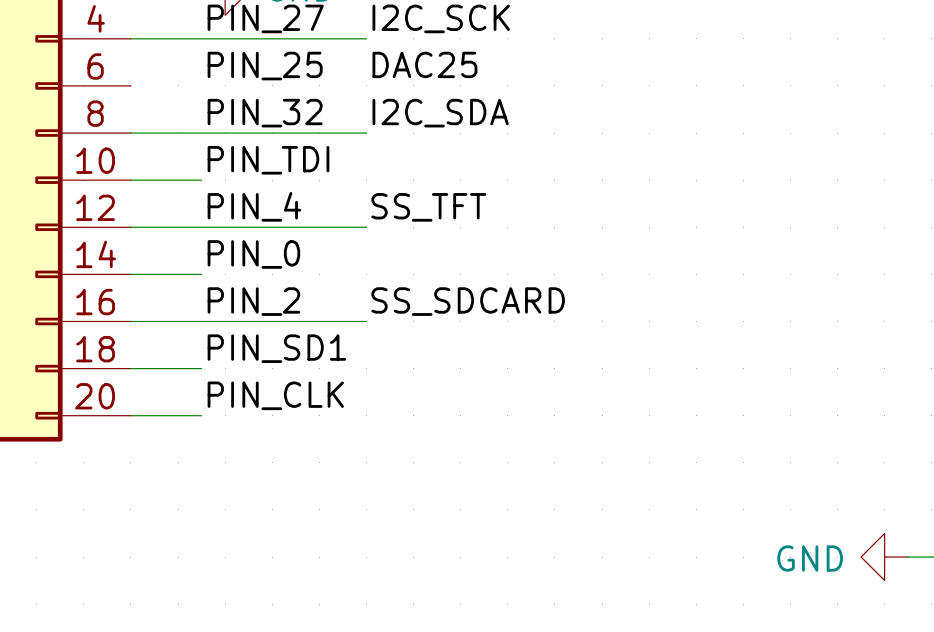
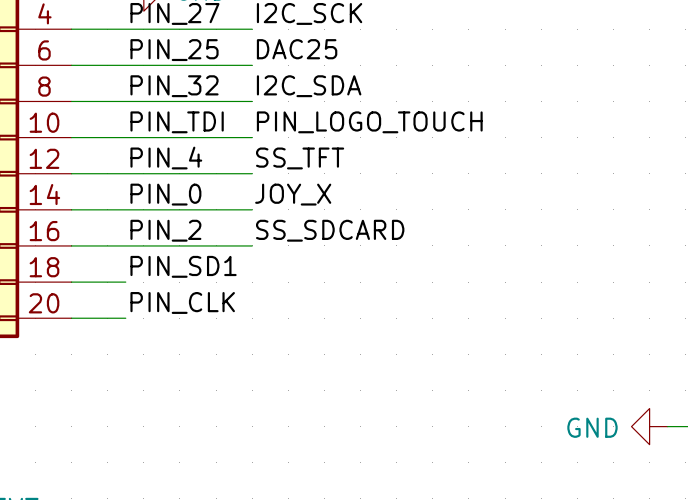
wire: none -> (71, 65) (252, 65)
label: none -> PIN_LOGO_TOUCH (369, 122)
wire: none -> (125, 137) (252, 137)
label: none -> JOY_X (293, 194)
wire: none -> (125, 209) (252, 209)

